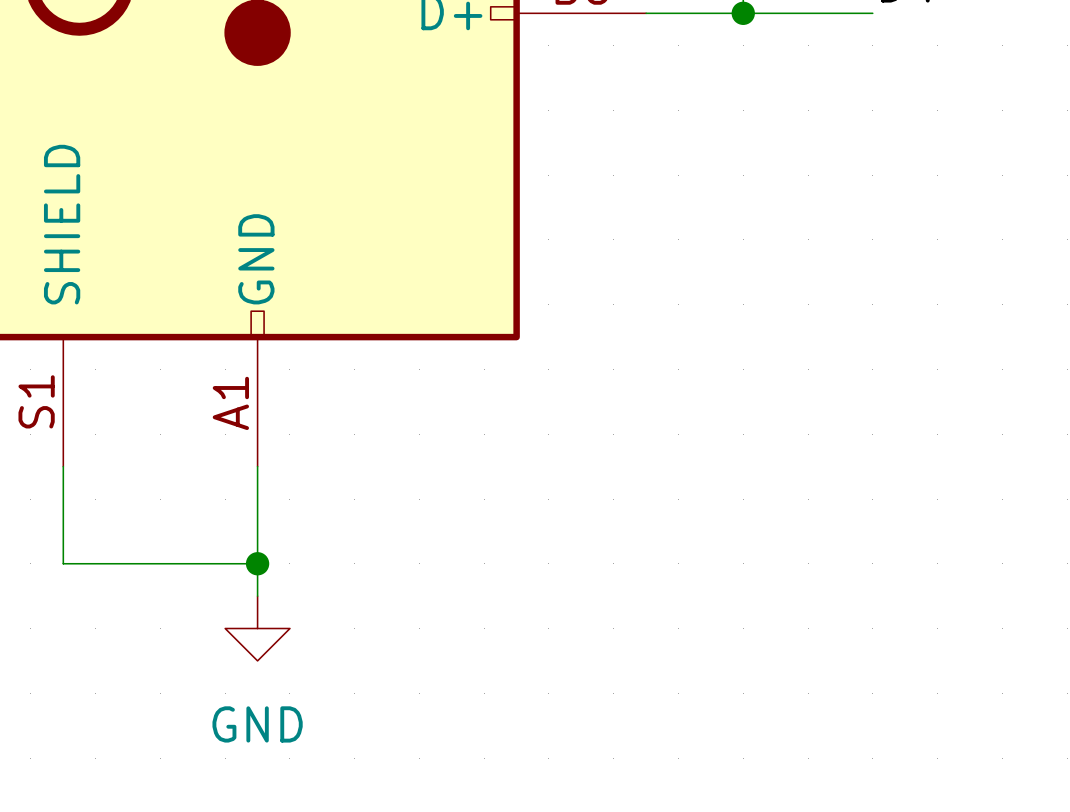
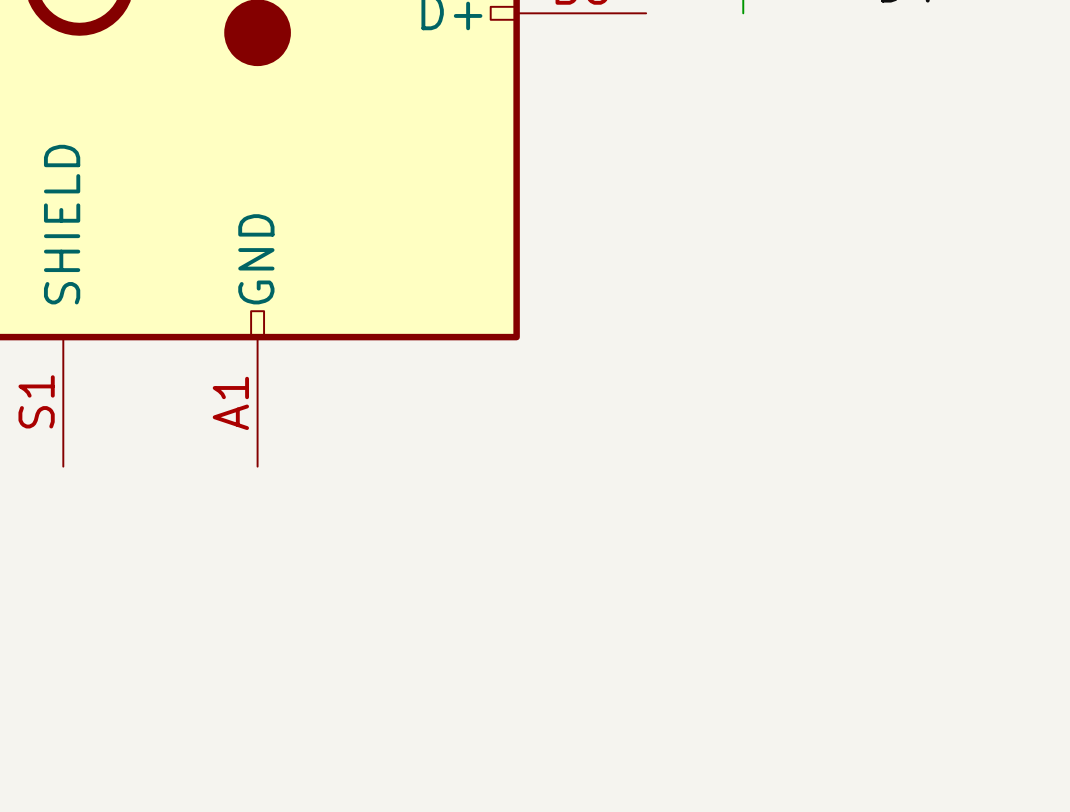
wire: (646, 13) (872, 13) -> none
junction: (743, 13) -> none
wire: (63, 466) (63, 563) (257, 563) -> none
wire: (257, 466) (257, 596) -> none
junction: (257, 563) -> none
power symbol: GND (257, 628) -> none

